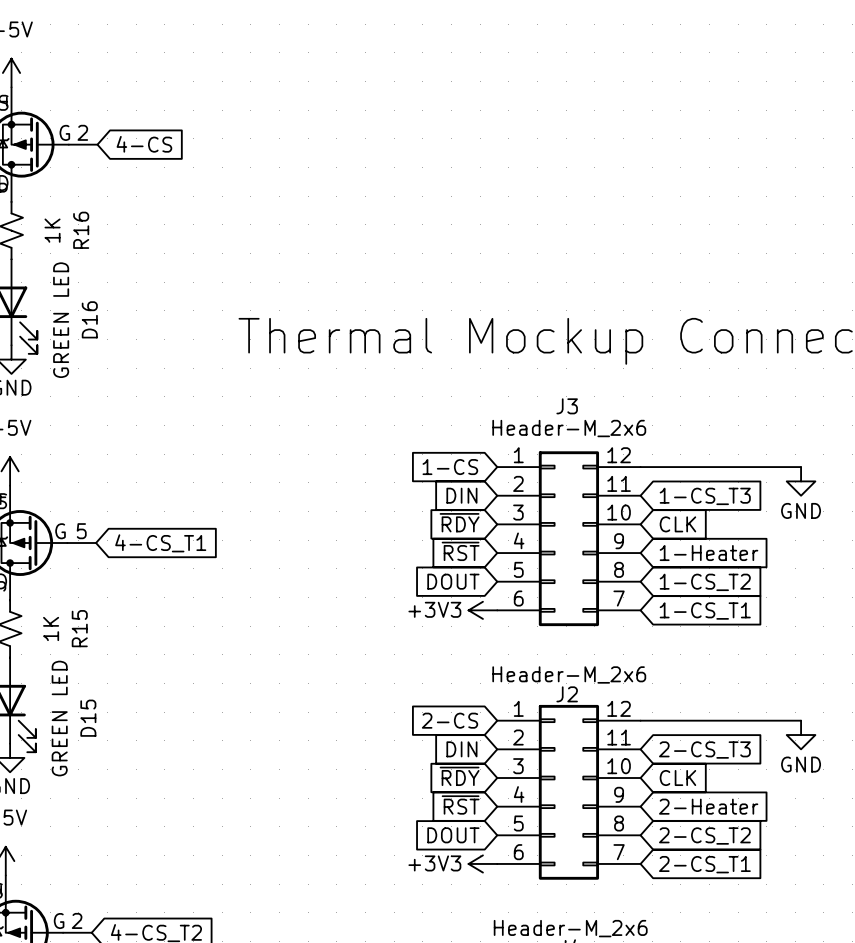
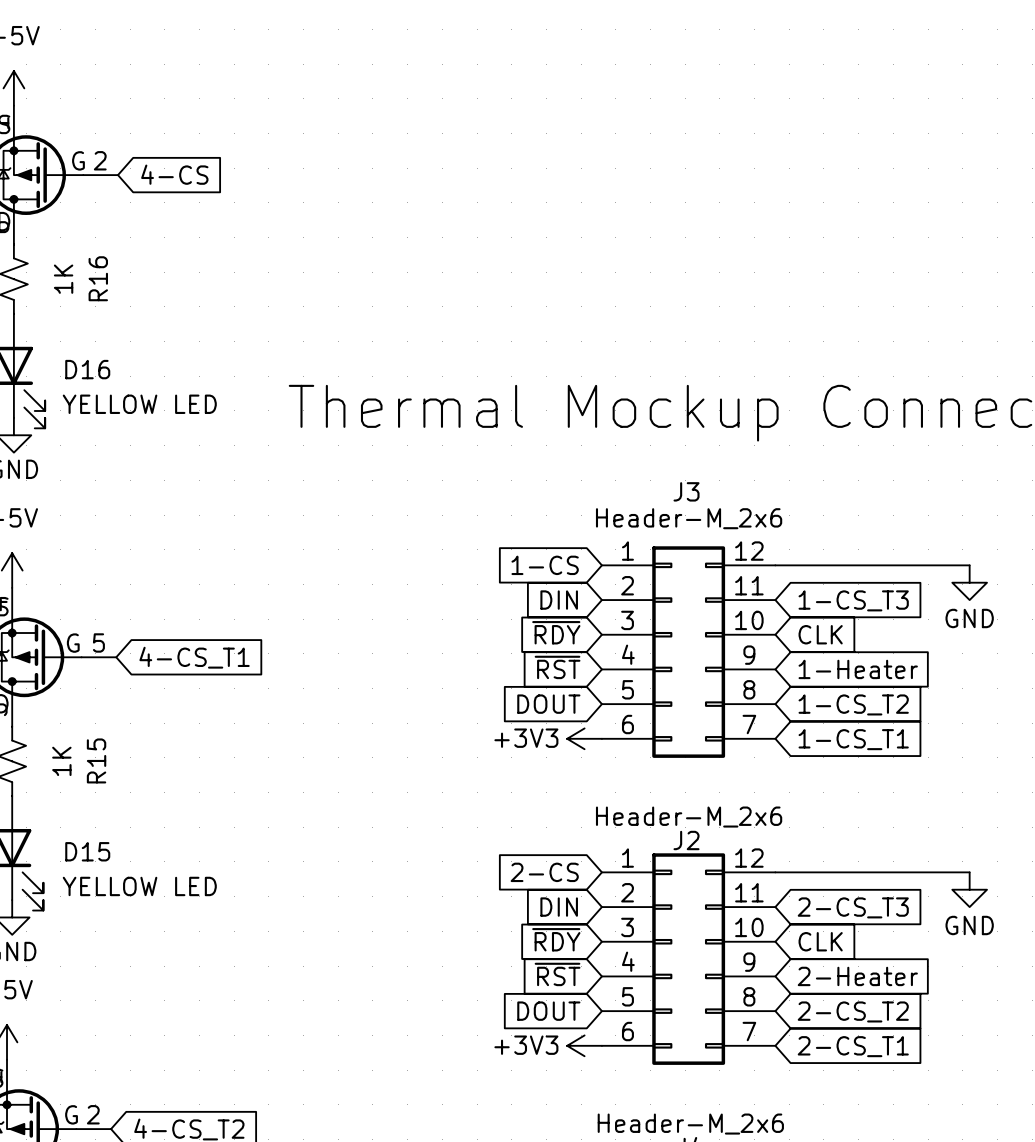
D16 name rotation: 0° (89, 319) -> 90° clockwise (87, 369)
D16 value: GREEN LED (61, 320) -> YELLOW LED (139, 404)
D15 value: GREEN LED (59, 718) -> YELLOW LED (139, 886)
D15 name rotation: 0° (88, 718) -> 90° clockwise (87, 851)

